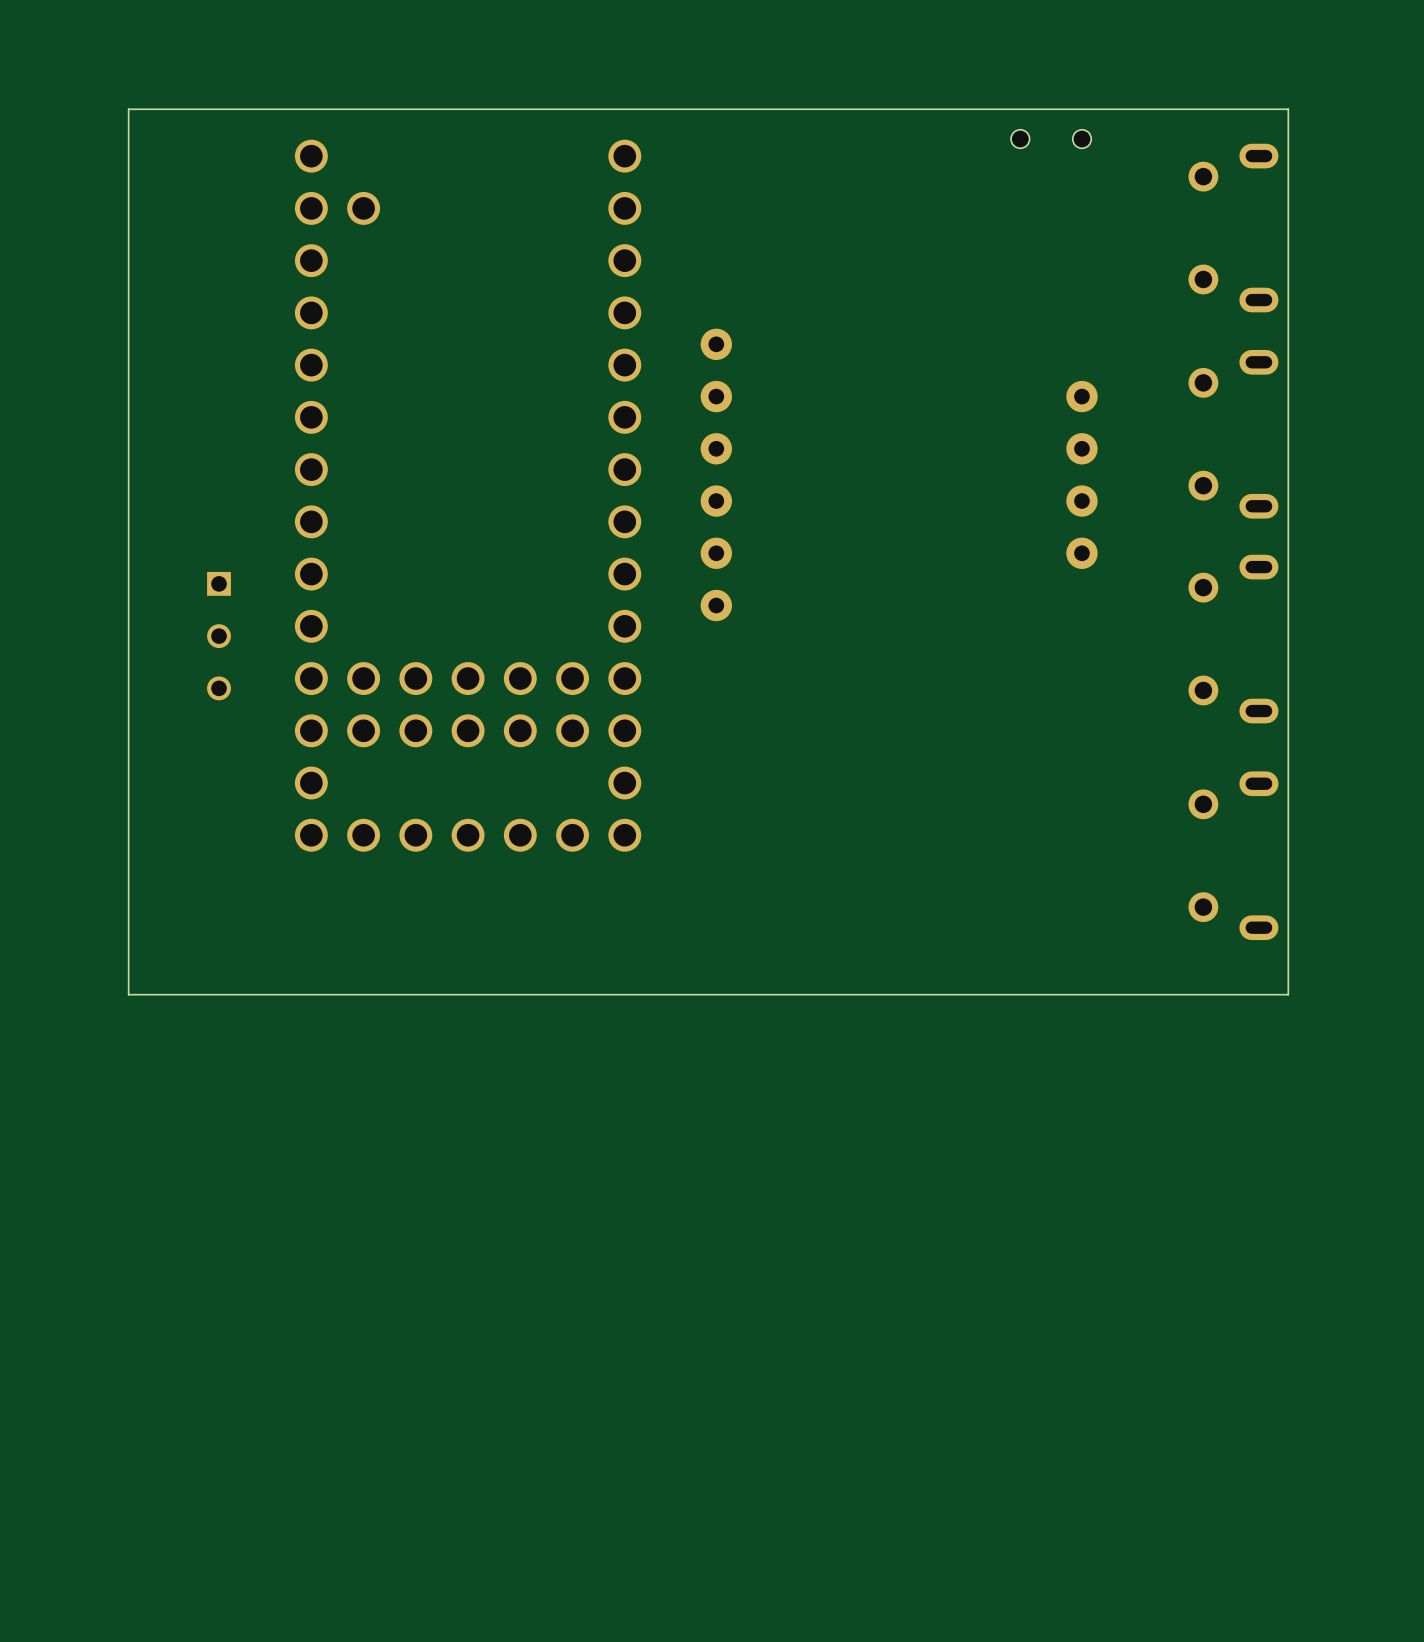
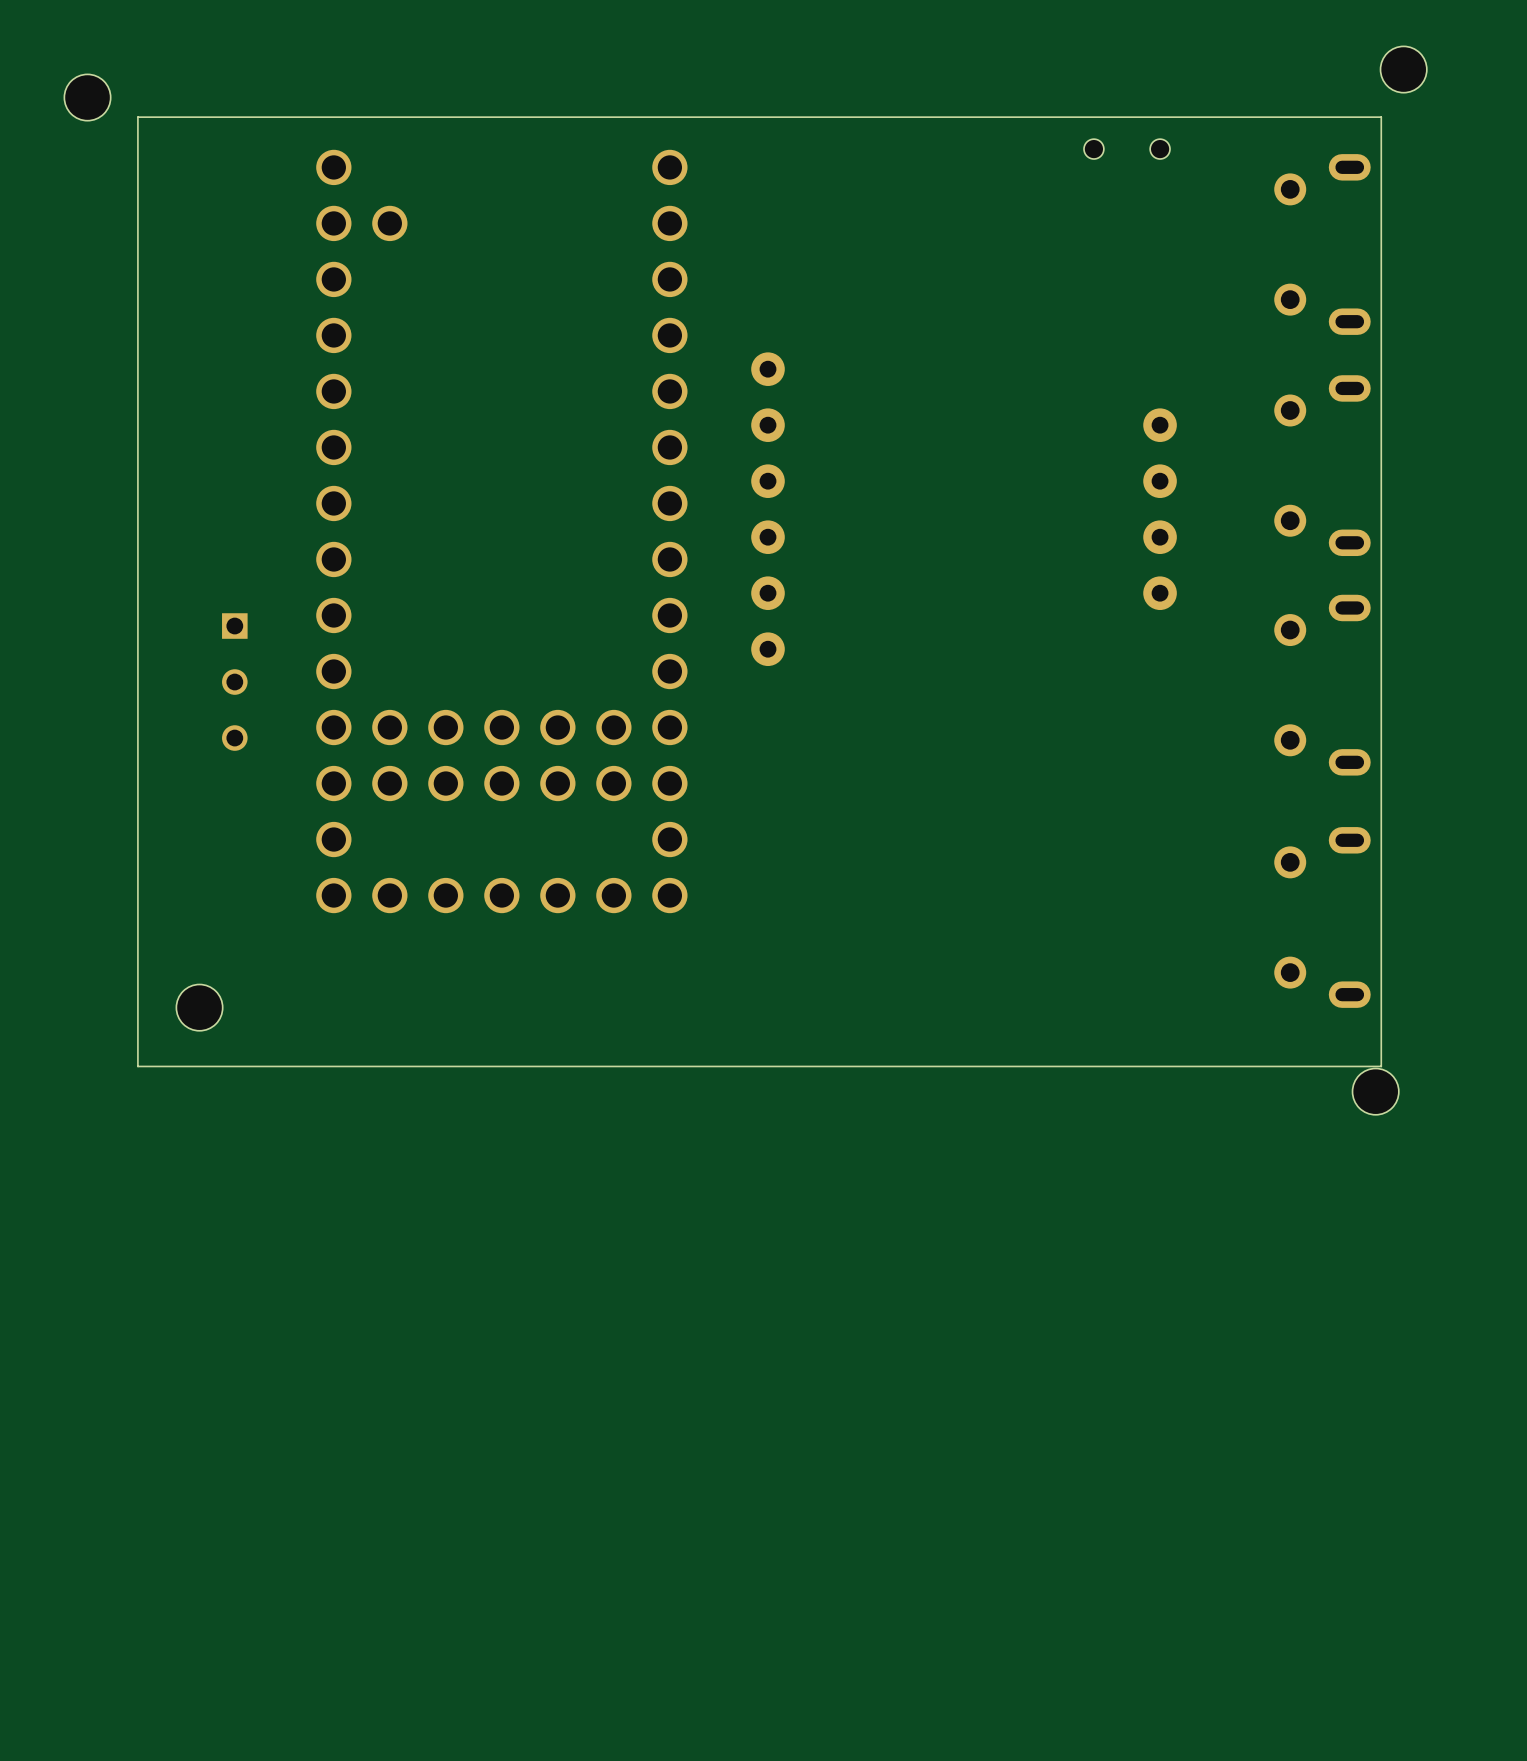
part: none -> (1403, 69)
part: none -> (87, 97)
part: none -> (199, 1007)
part: none -> (1375, 1091)

